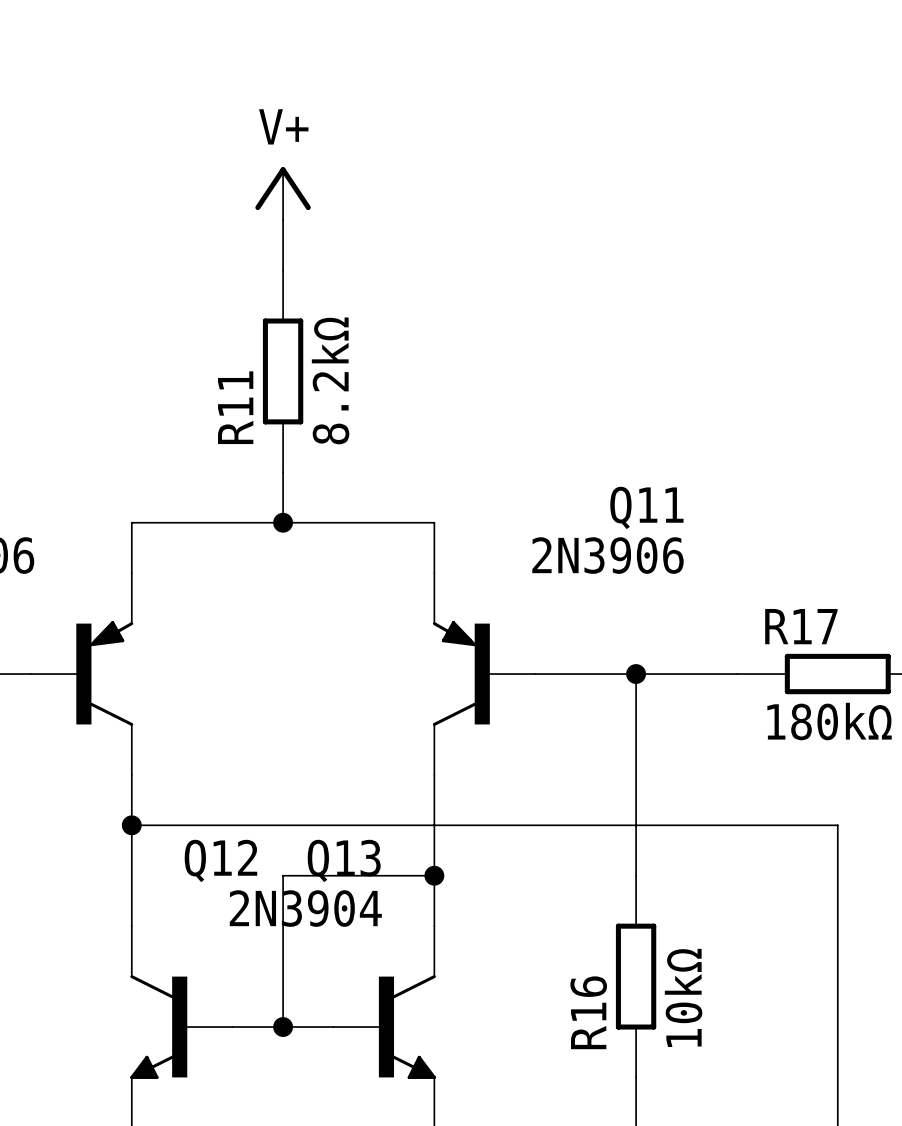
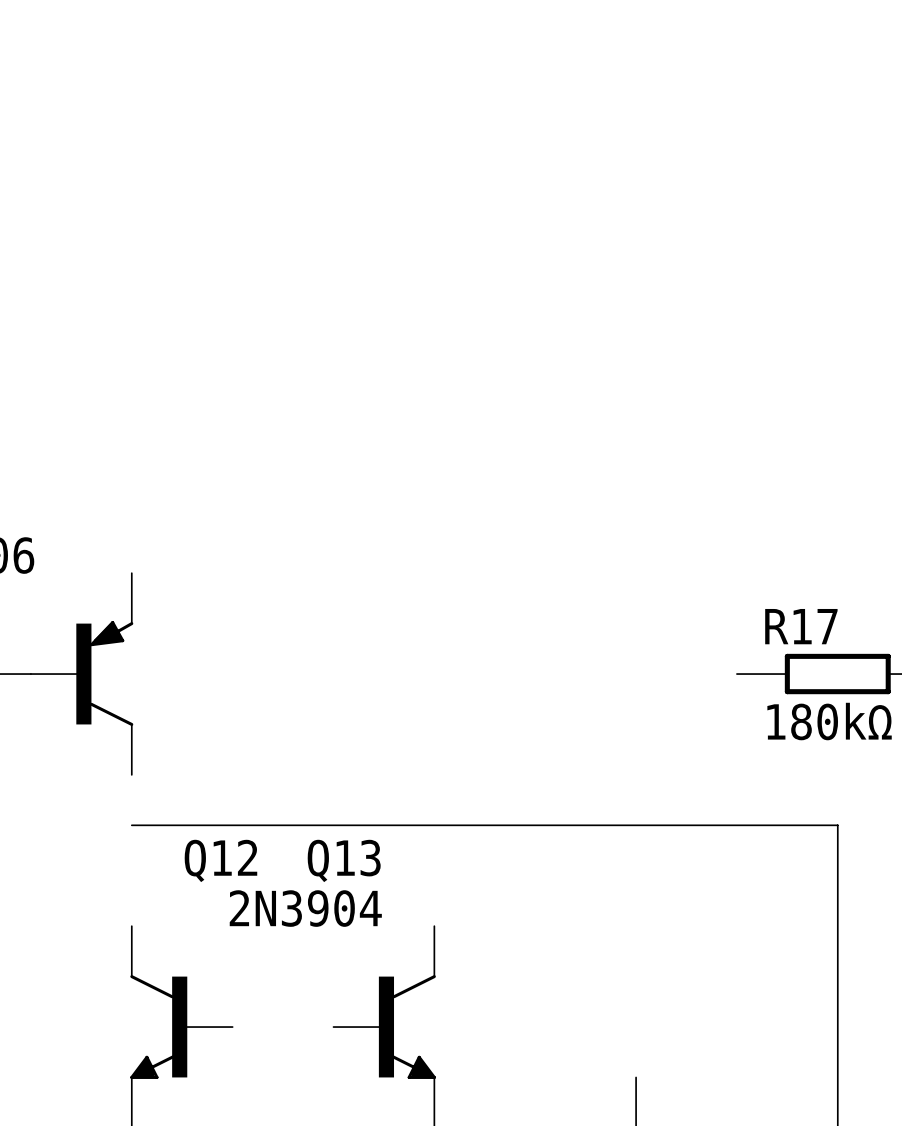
power symbol: V+ (283, 193) -> none
wire: (283, 220) (283, 270) -> none
R11: 8.2kΩ (283, 371) -> none
wire: (283, 472) (283, 522) -> none
junction: (283, 522) -> none
wire: (131, 573) (131, 522) (434, 522) (434, 573) -> none
Q11: 2N3906 (484, 674) -> none
wire: (535, 674) (736, 674) -> none
wire: (636, 674) (636, 875) -> none
junction: (636, 674) -> none
wire: (131, 774) (131, 926) -> none
wire: (434, 774) (434, 926) -> none
junction: (131, 825) -> none
wire: (434, 875) (283, 875) (283, 1027) -> none
junction: (434, 875) -> none
R16: 10kΩ (636, 976) -> none
wire: (232, 1027) (333, 1027) -> none
junction: (283, 1027) -> none

